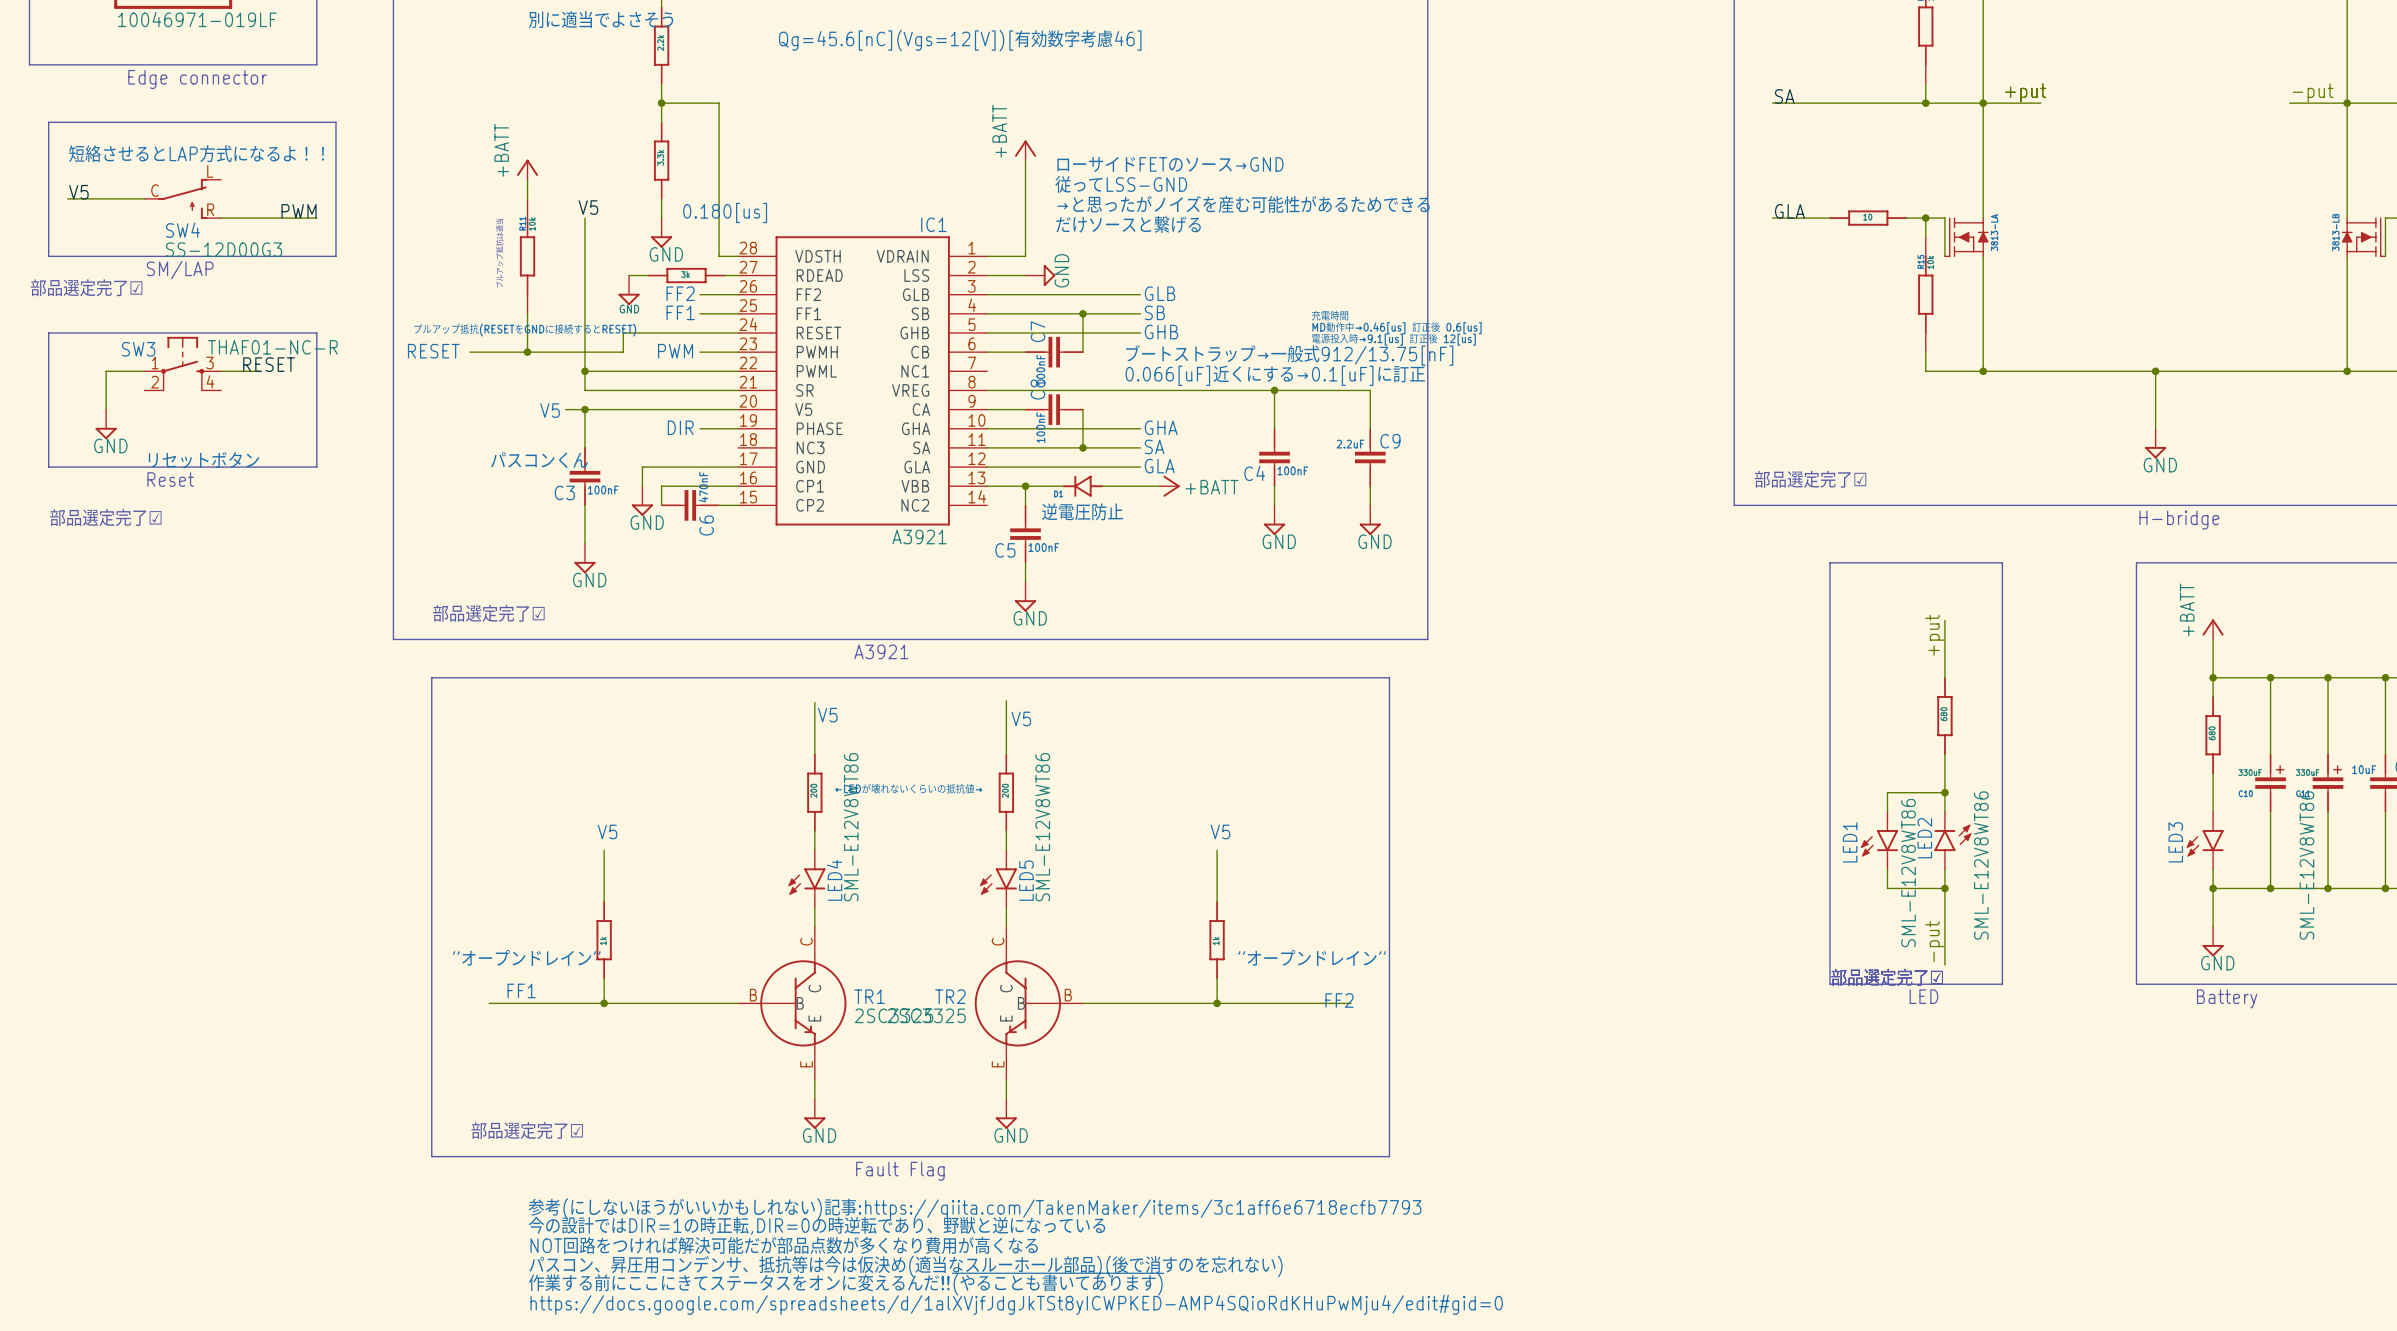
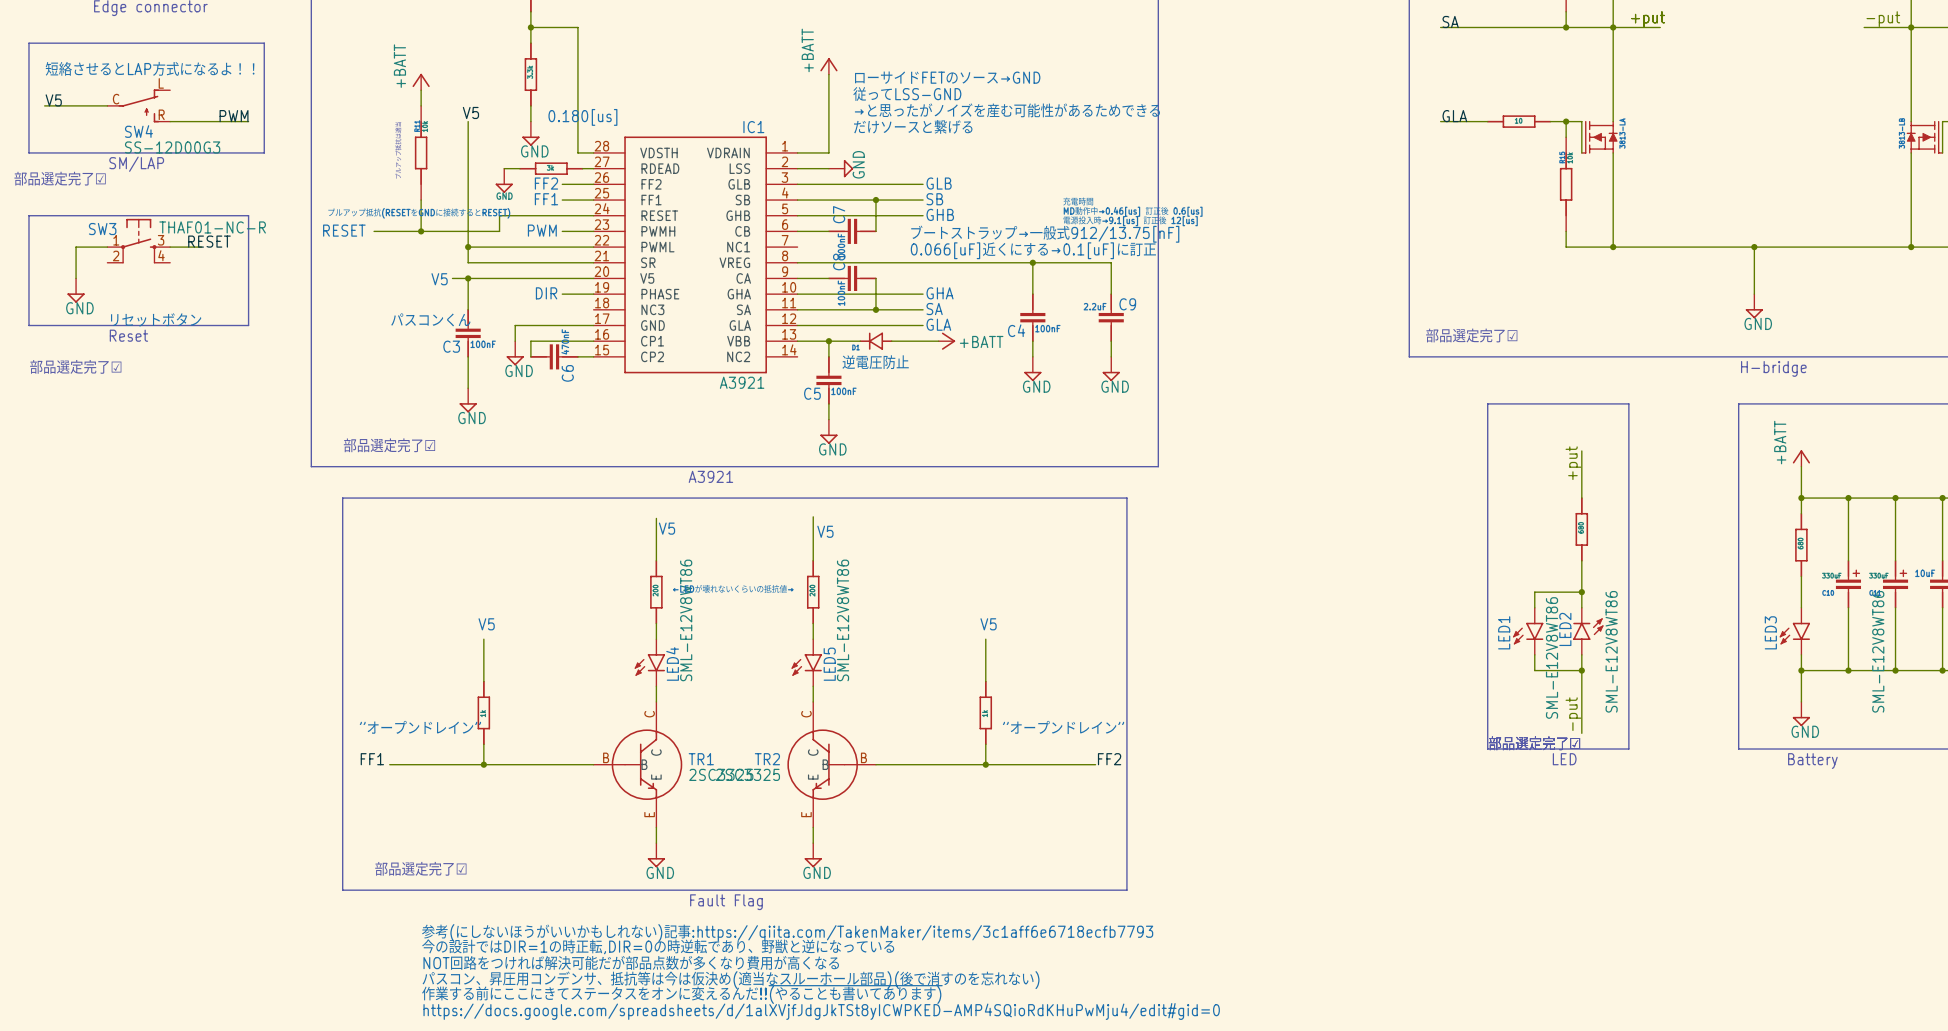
text: FF1 (521, 990) -> none
label: none -> FF1 (372, 759)
label: none -> FF2 (1109, 759)
text: FF2 (1339, 1000) -> none

